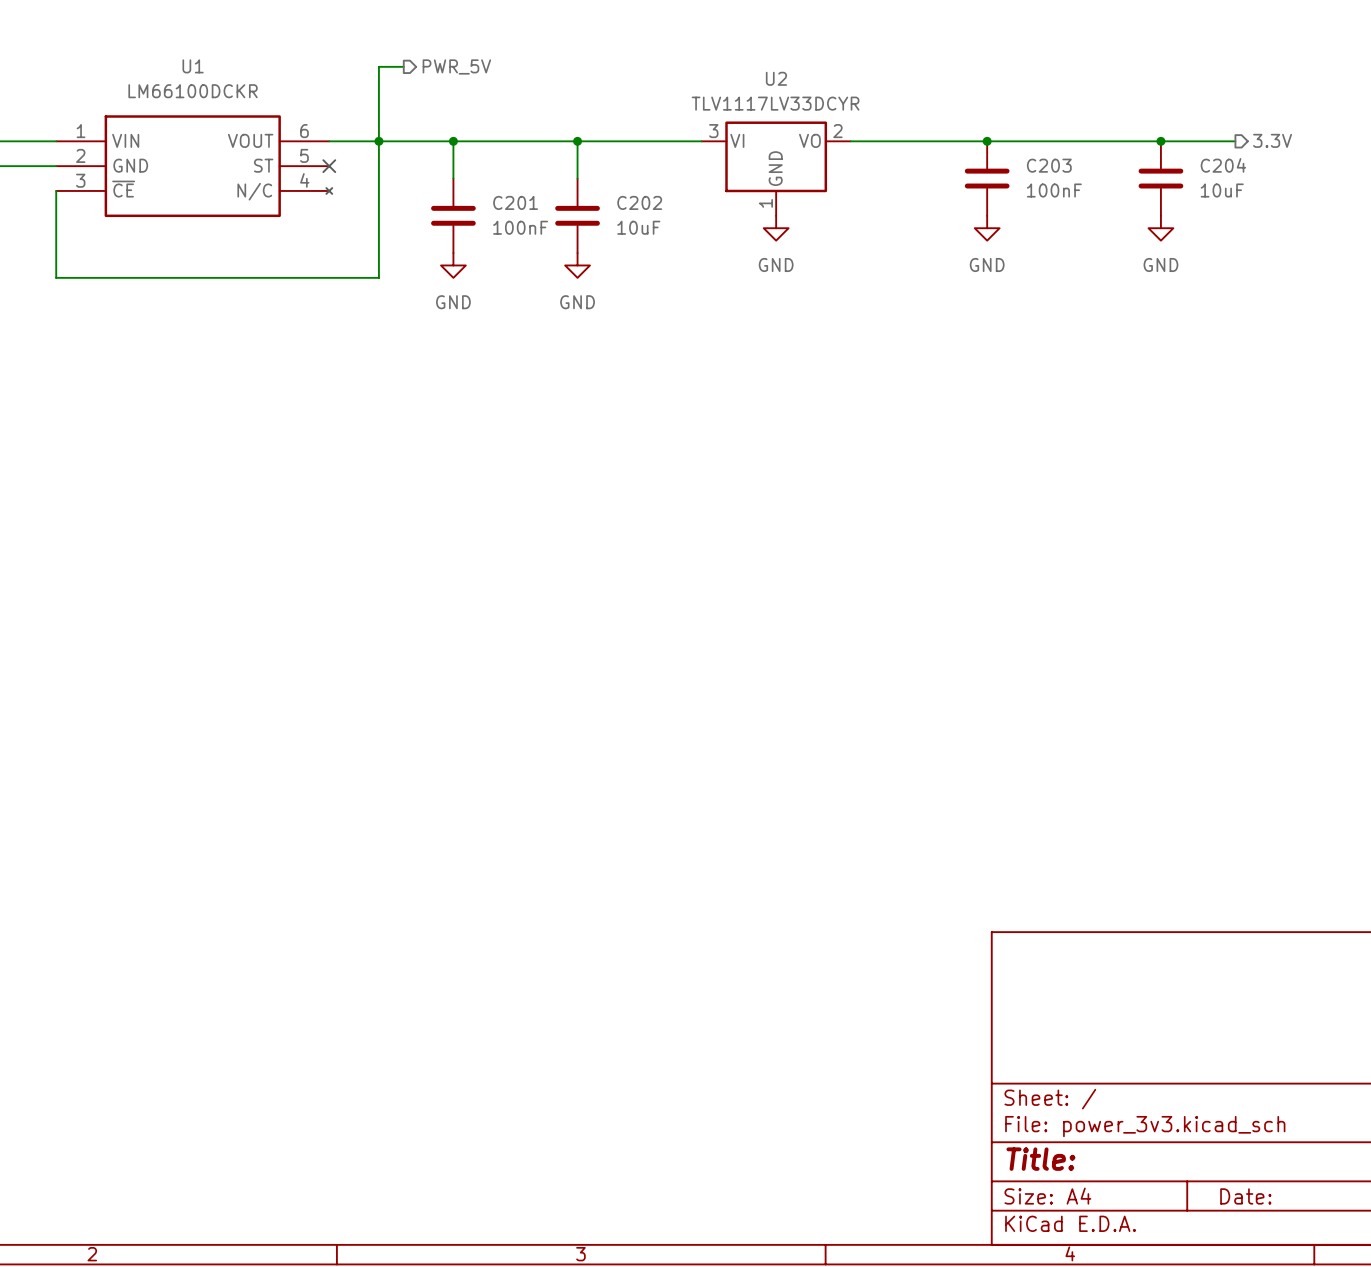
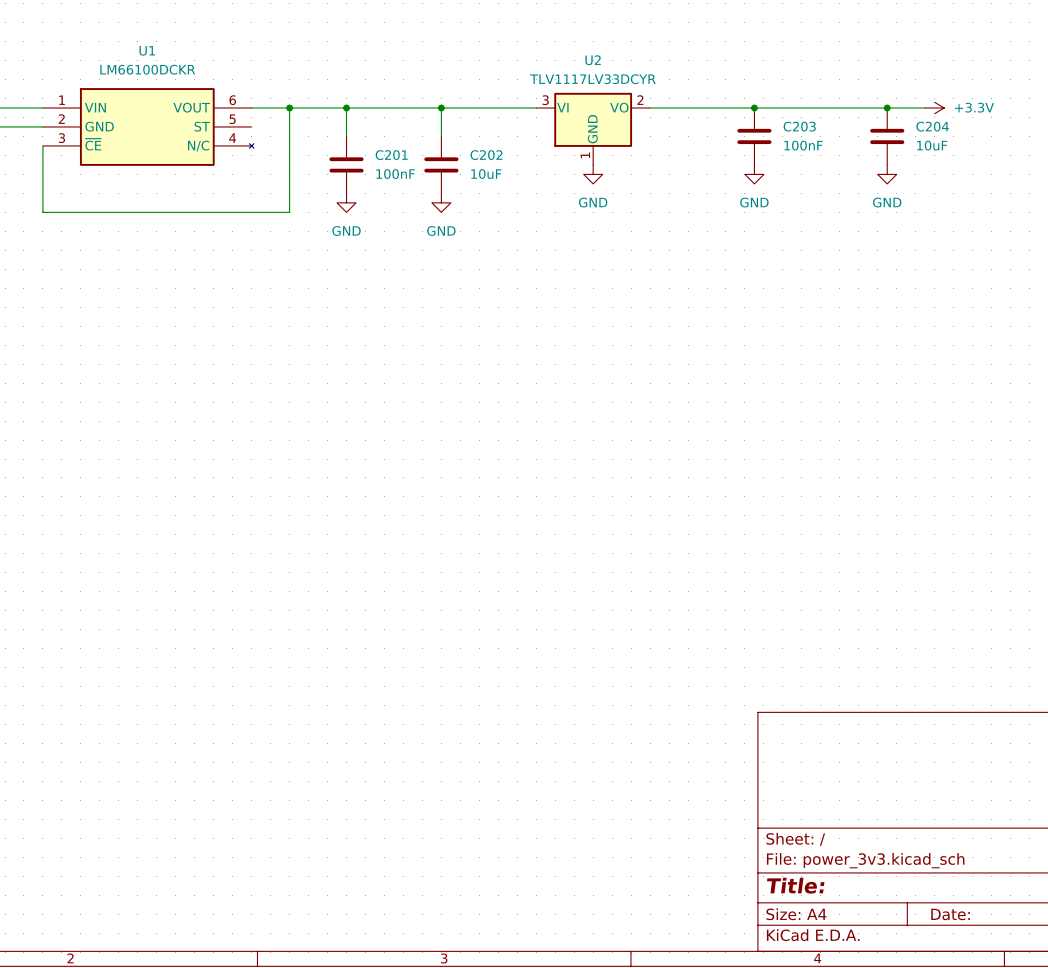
wire: (403, 66) (378, 66) (378, 141) -> none
hierarchical label: PWR_5V (456, 66) -> none
hierarchical label: 3.3V (1272, 140) -> none
power symbol: none -> +3.3V (934, 108)
no-connect mark: (329, 166) -> none

